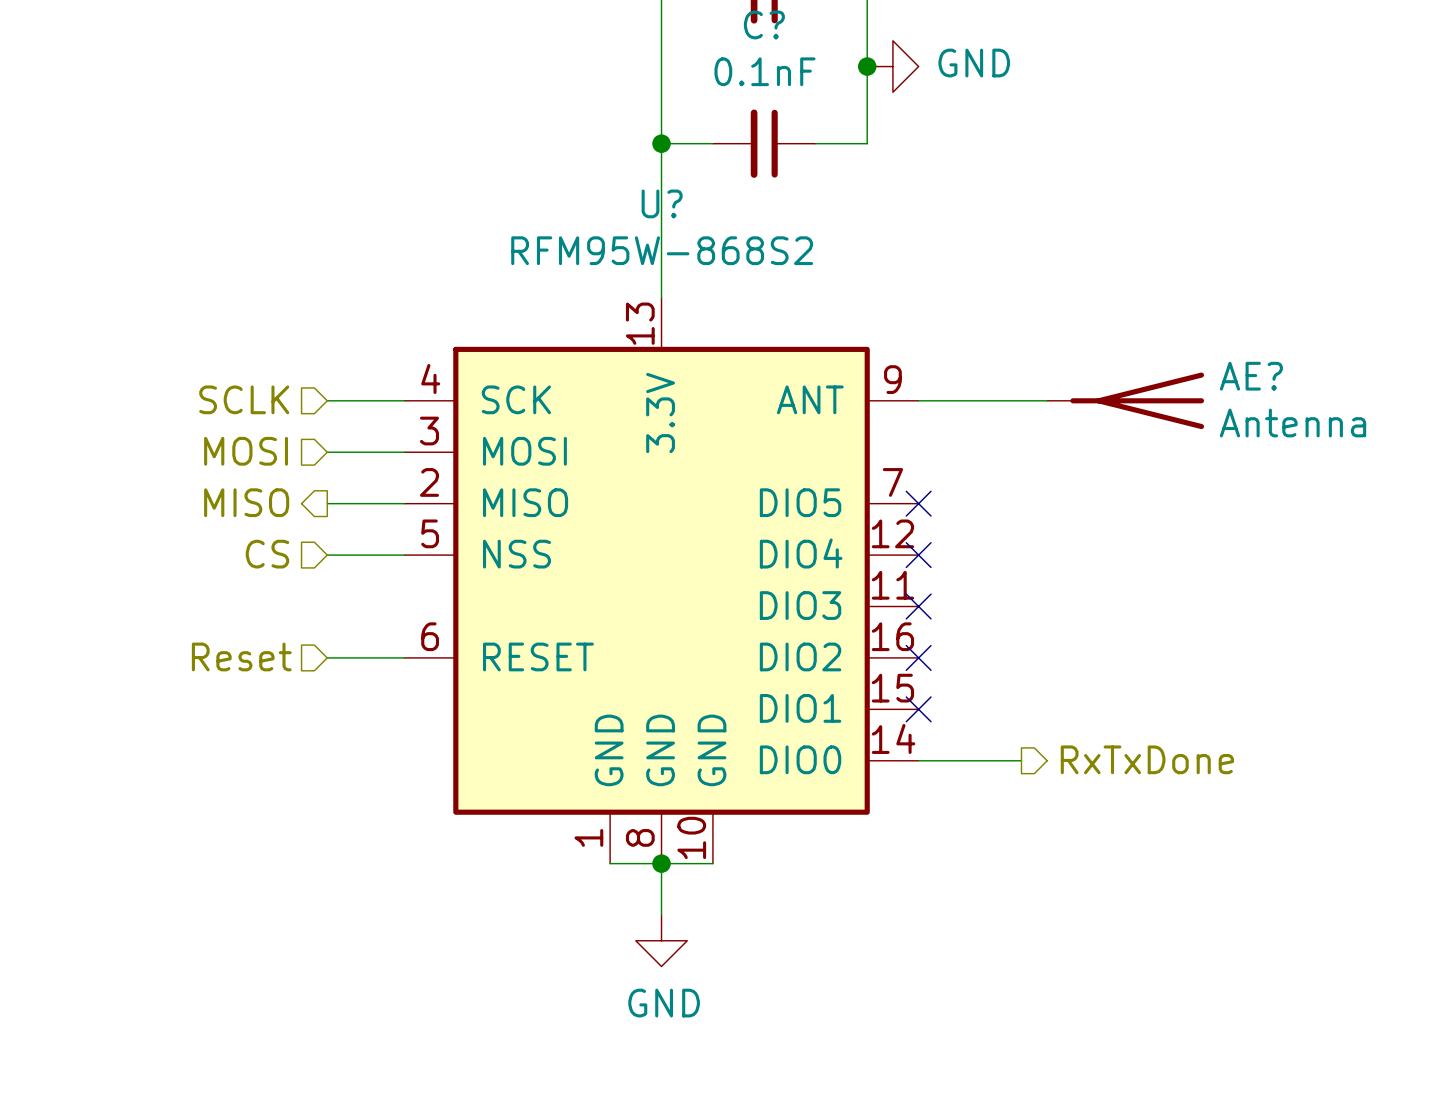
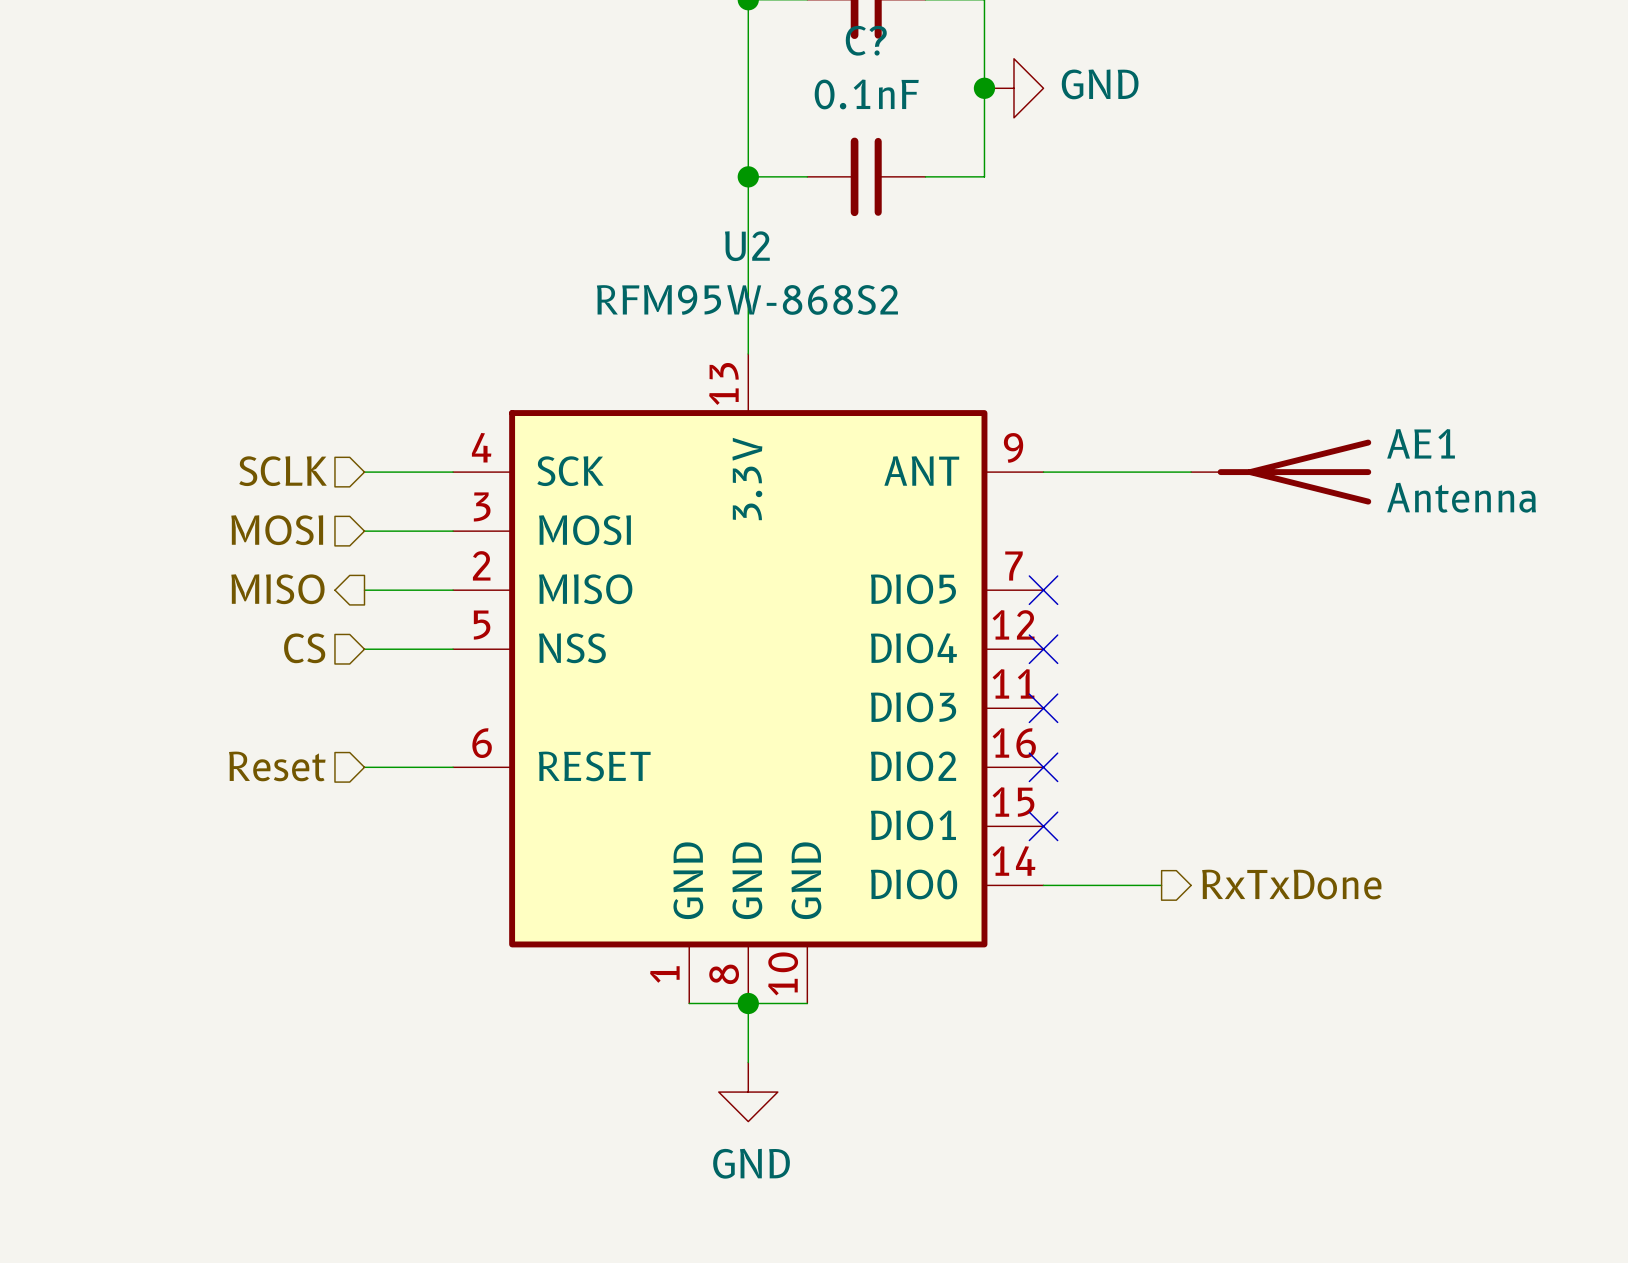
U? name: U? (662, 203) -> U2 (747, 246)
AE? name: AE? (1251, 376) -> AE1 (1421, 443)

